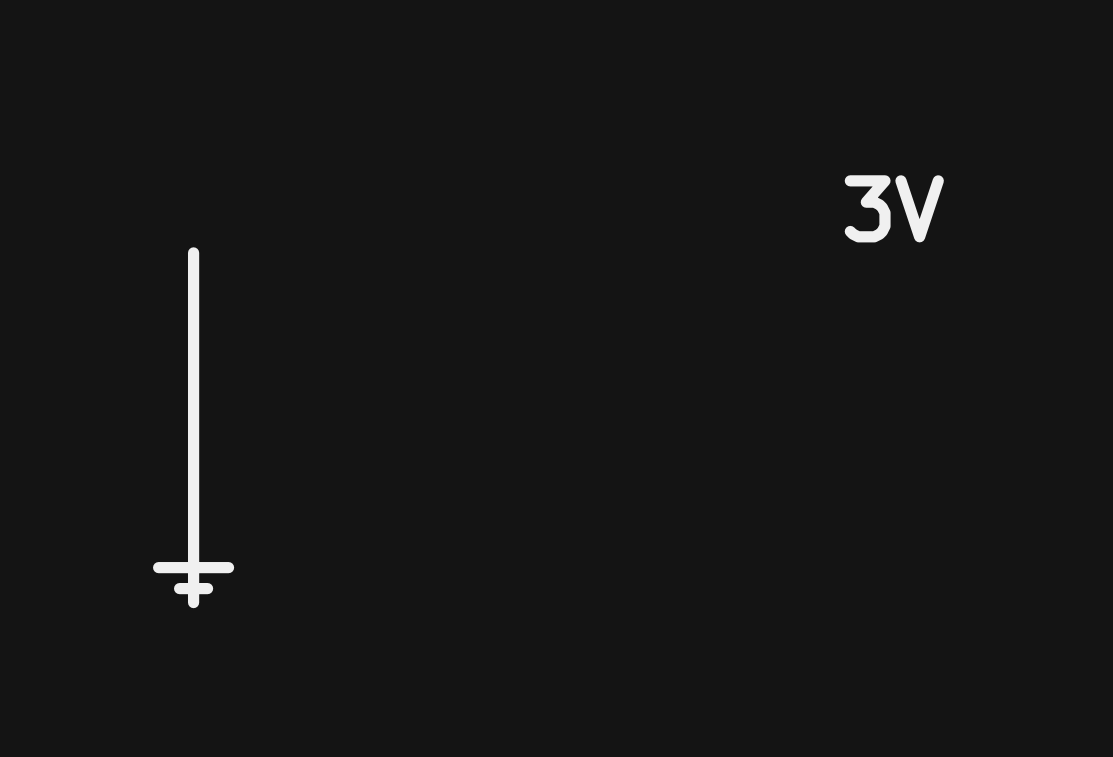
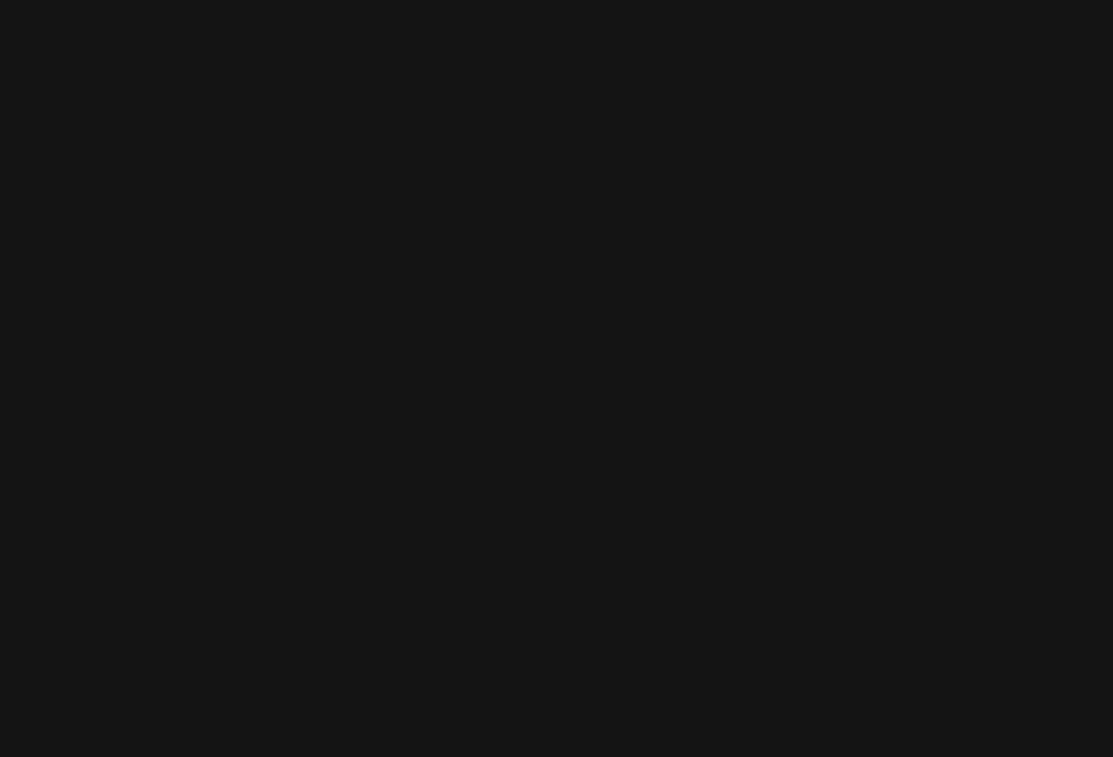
text: 3V (894, 208) -> none
line: (193, 252) (193, 602) -> none
line: (158, 567) (228, 567) -> none
line: (179, 588) (207, 588) -> none

